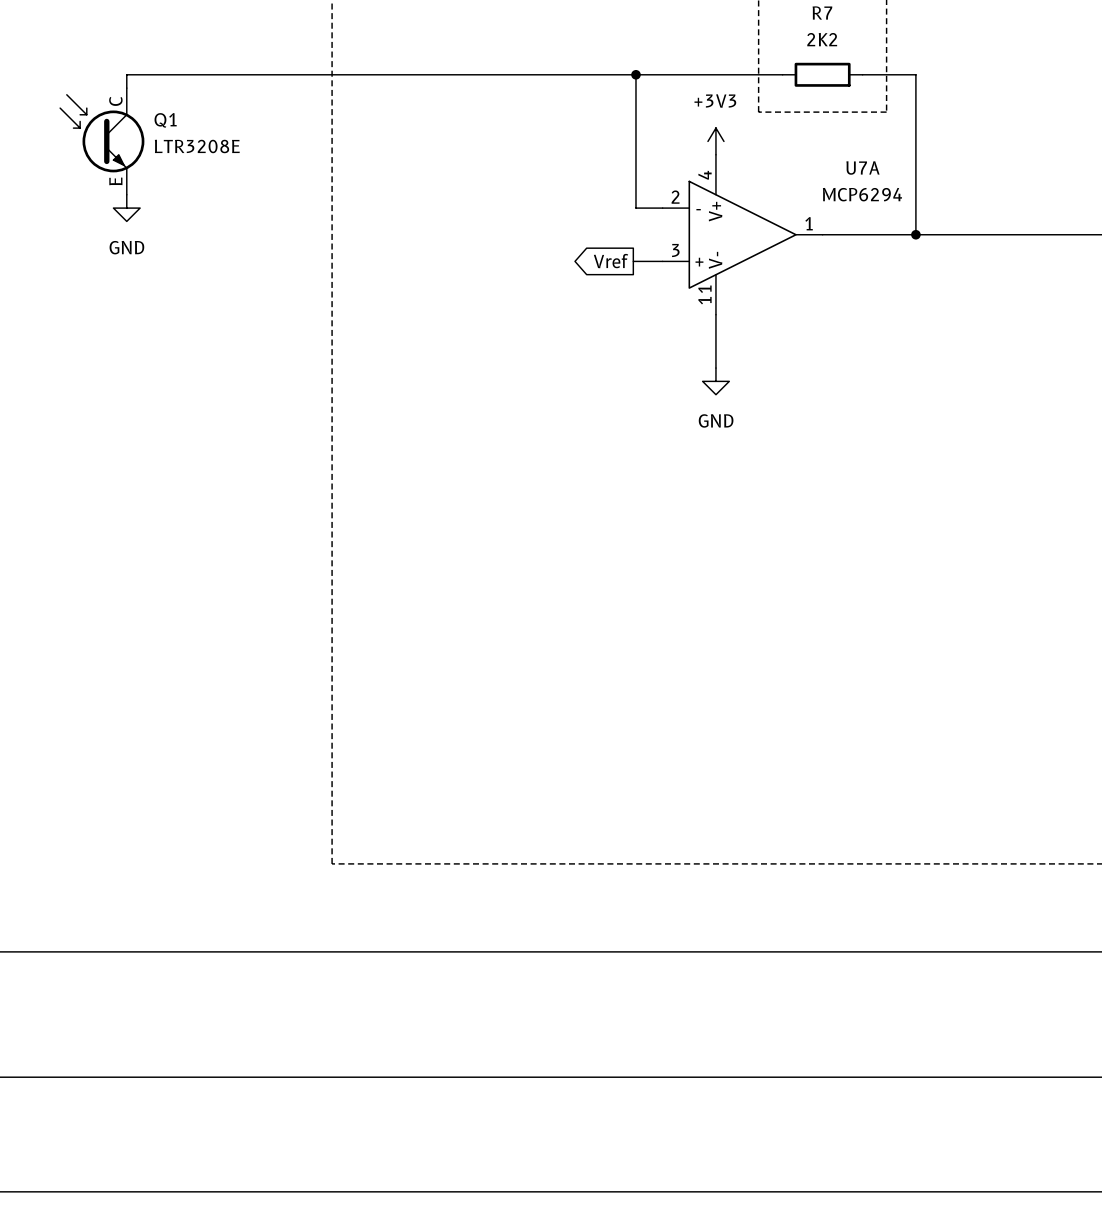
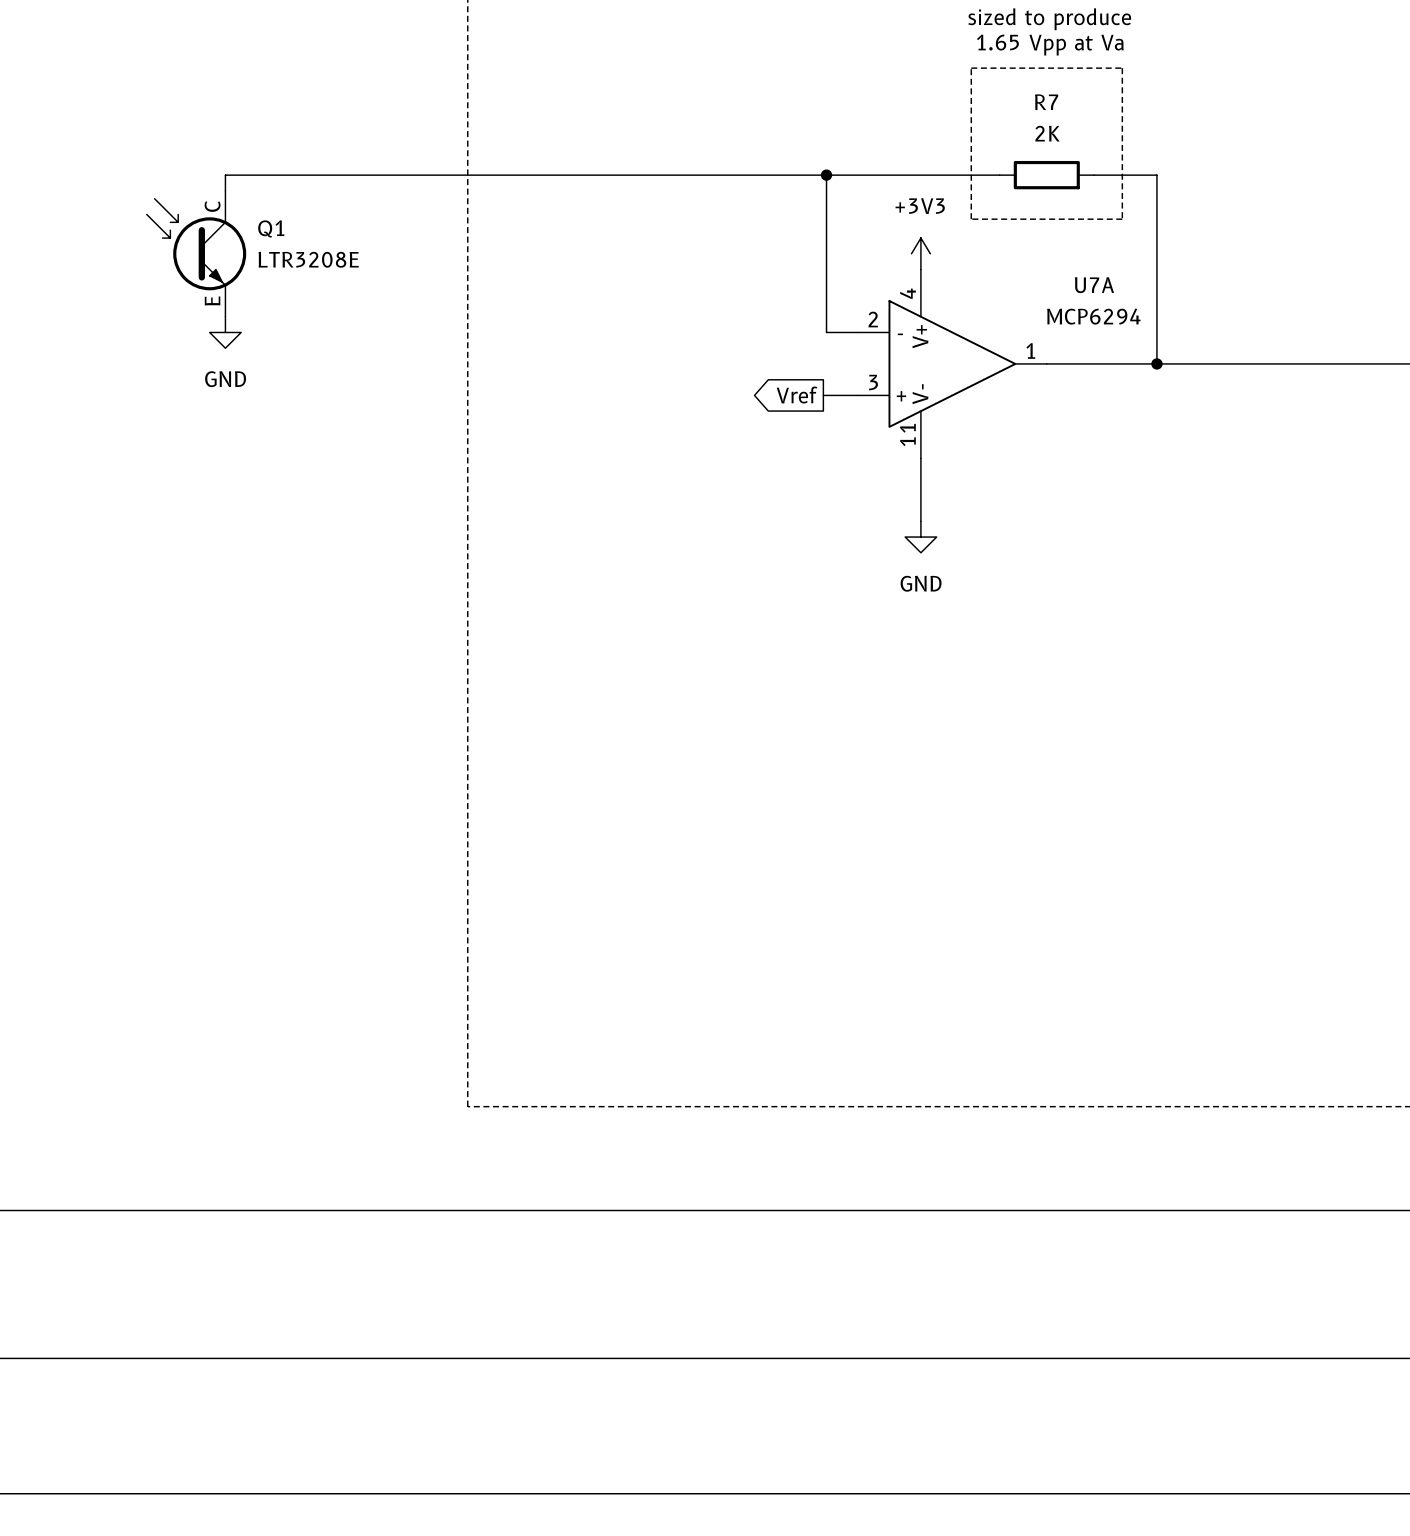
R7 value: 2K2 (822, 39) -> 2K (1047, 133)

